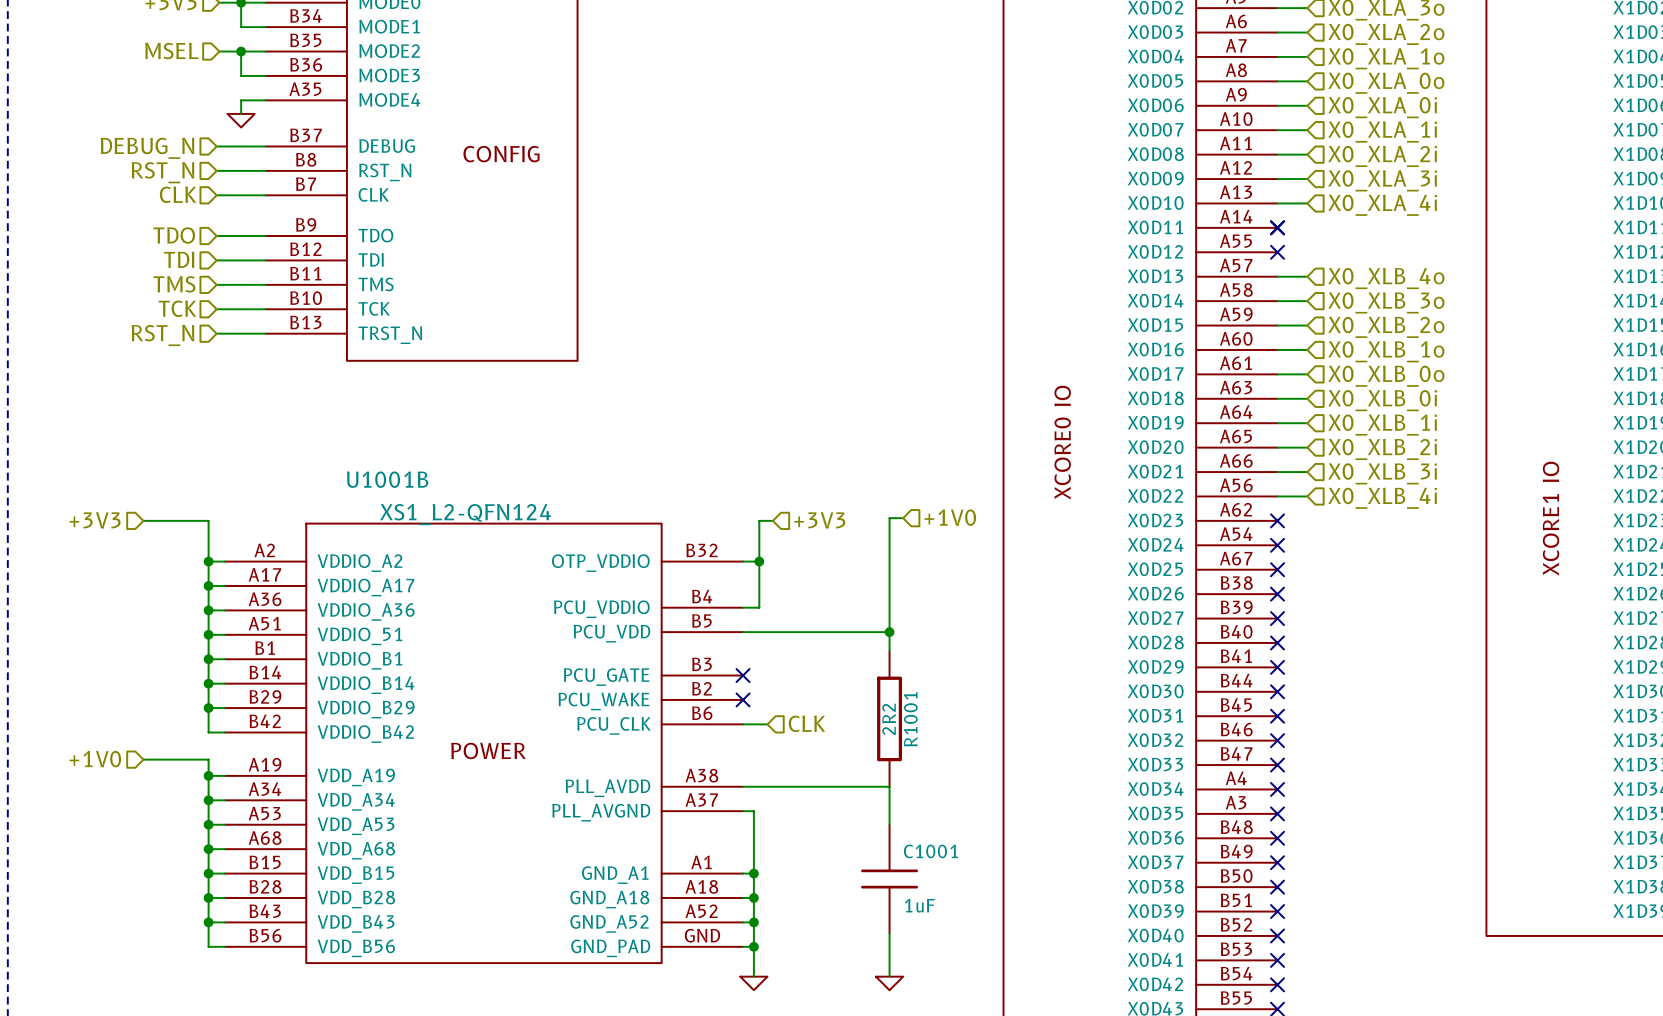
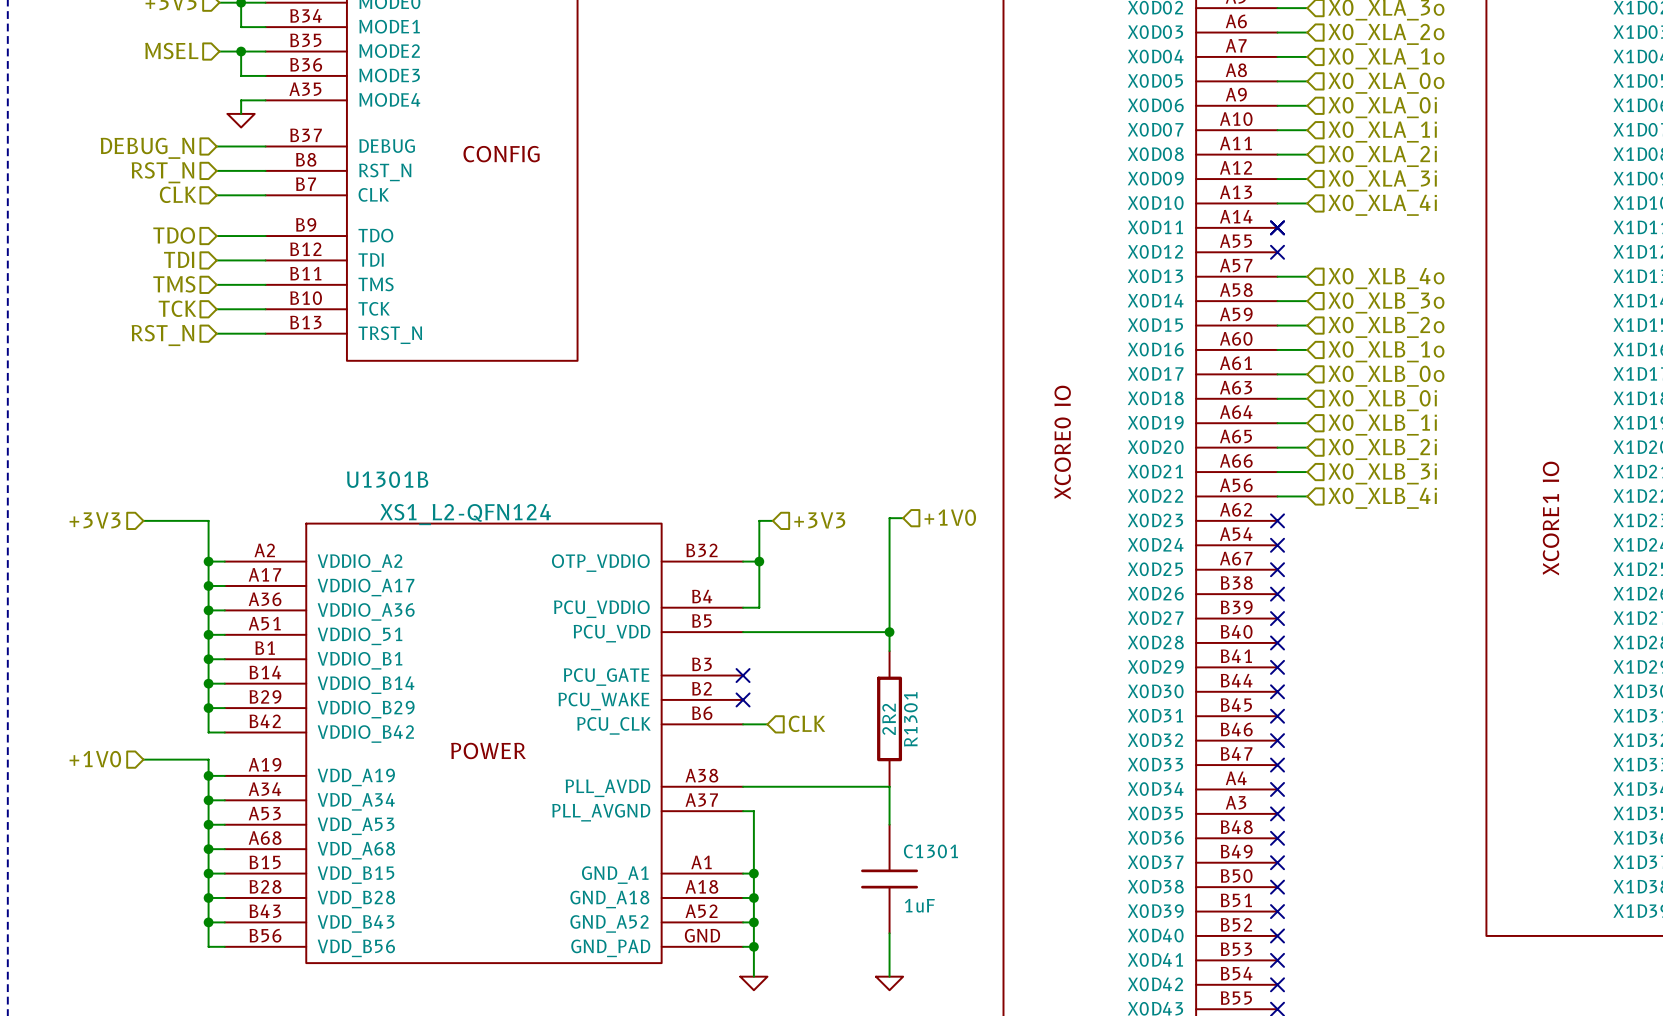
U1001B name: U1001B (387, 479) -> U1301B (387, 479)
R1001 name: R1001 (910, 719) -> R1301 (910, 719)
C1001 name: C1001 (930, 851) -> C1301 (930, 851)

